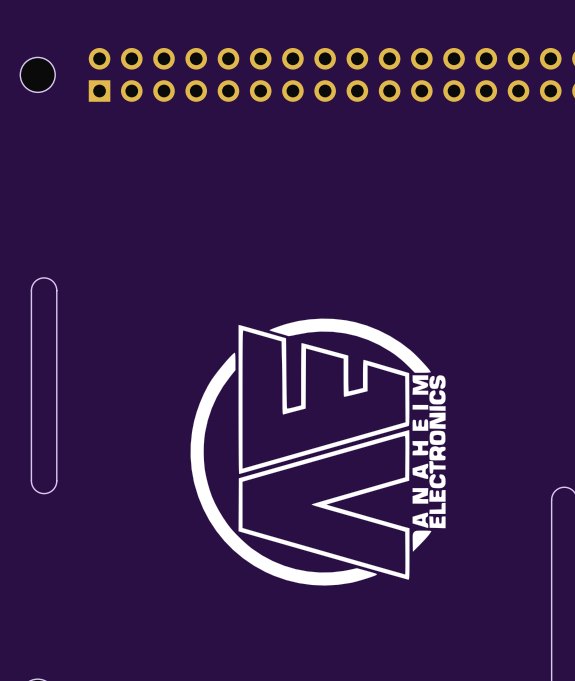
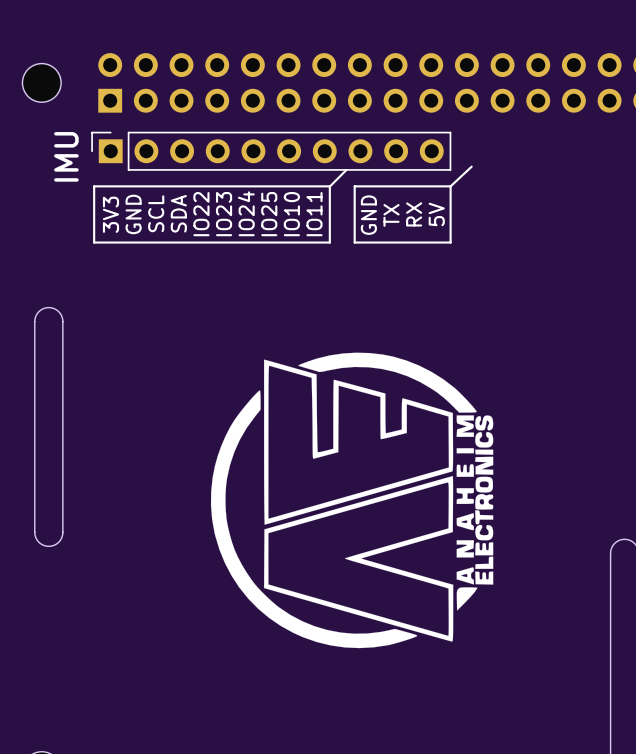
part: none -> (271, 151)
text: none -> IMU (66, 156)
line: none -> (471, 166) (450, 186)
line: none -> (346, 169) (330, 186)
line: none -> (94, 186) (329, 186) (329, 242) (94, 242) (94, 186)
line: none -> (450, 186) (354, 186) (354, 242) (450, 242) (450, 186)
text: none -> GND (133, 214)
text: none -> SCL (156, 213)
text: none -> SDA (178, 213)
text: none -> IO22 (201, 214)
text: none -> IO23 (224, 214)
text: none -> IO24 (246, 213)
text: none -> IO25 (269, 214)
text: none -> IO10 (291, 214)
text: none -> IO11 (314, 214)
text: none -> RX (414, 214)
text: none -> 5V (436, 214)
text: none -> 3V3 (110, 214)
text: none -> GND (368, 215)
text: none -> TX (391, 215)

